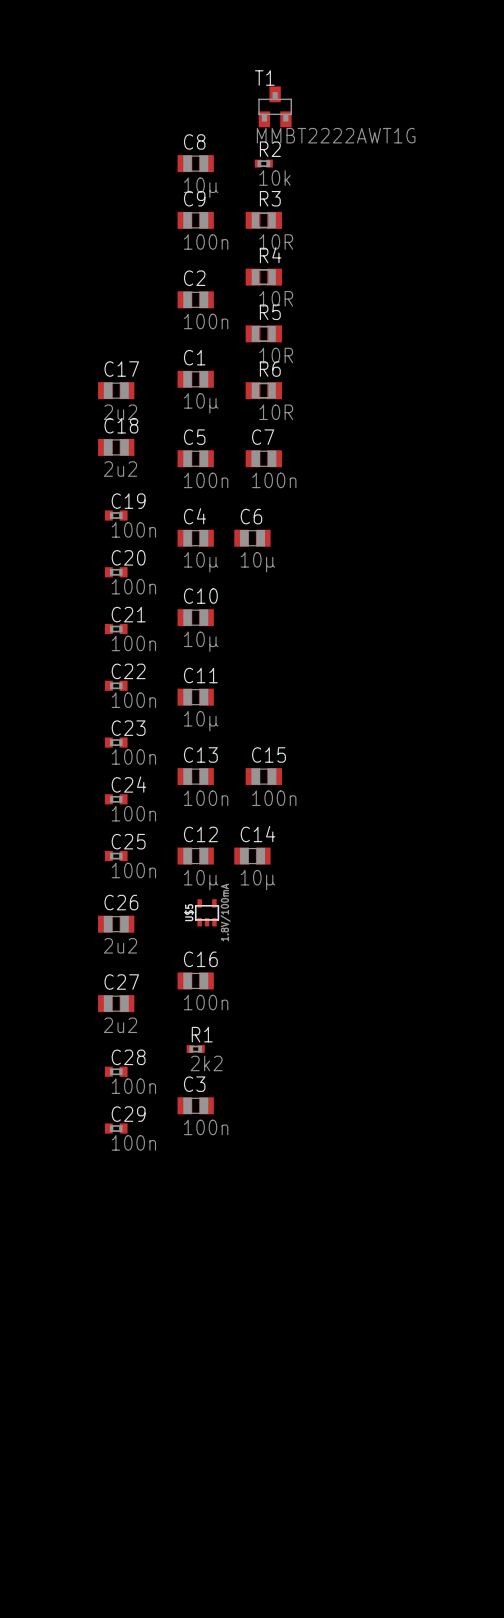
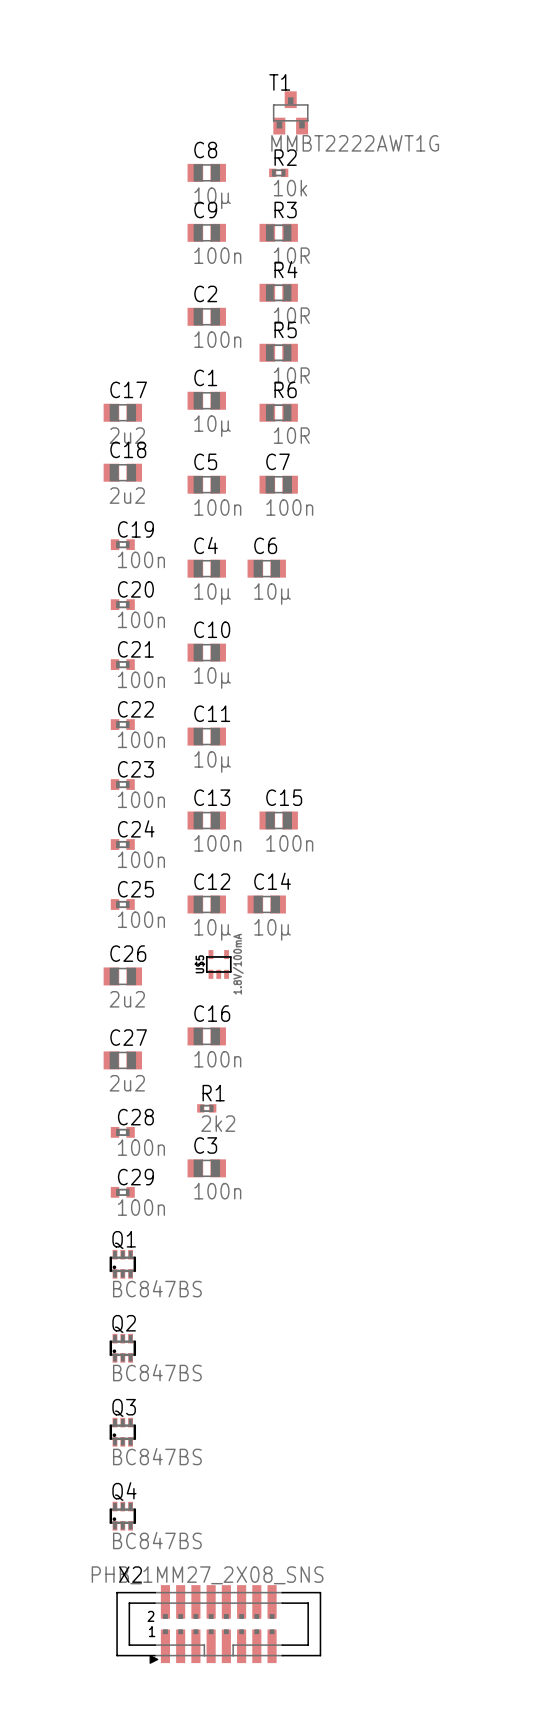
Q1: none -> BC847BS (122, 1264)
Q2: none -> BC847BS (122, 1348)
Q3: none -> BC847BS (122, 1432)
Q4: none -> BC847BS (122, 1516)
X2: none -> PHB_1MM27_2X08_SNS (218, 1624)

